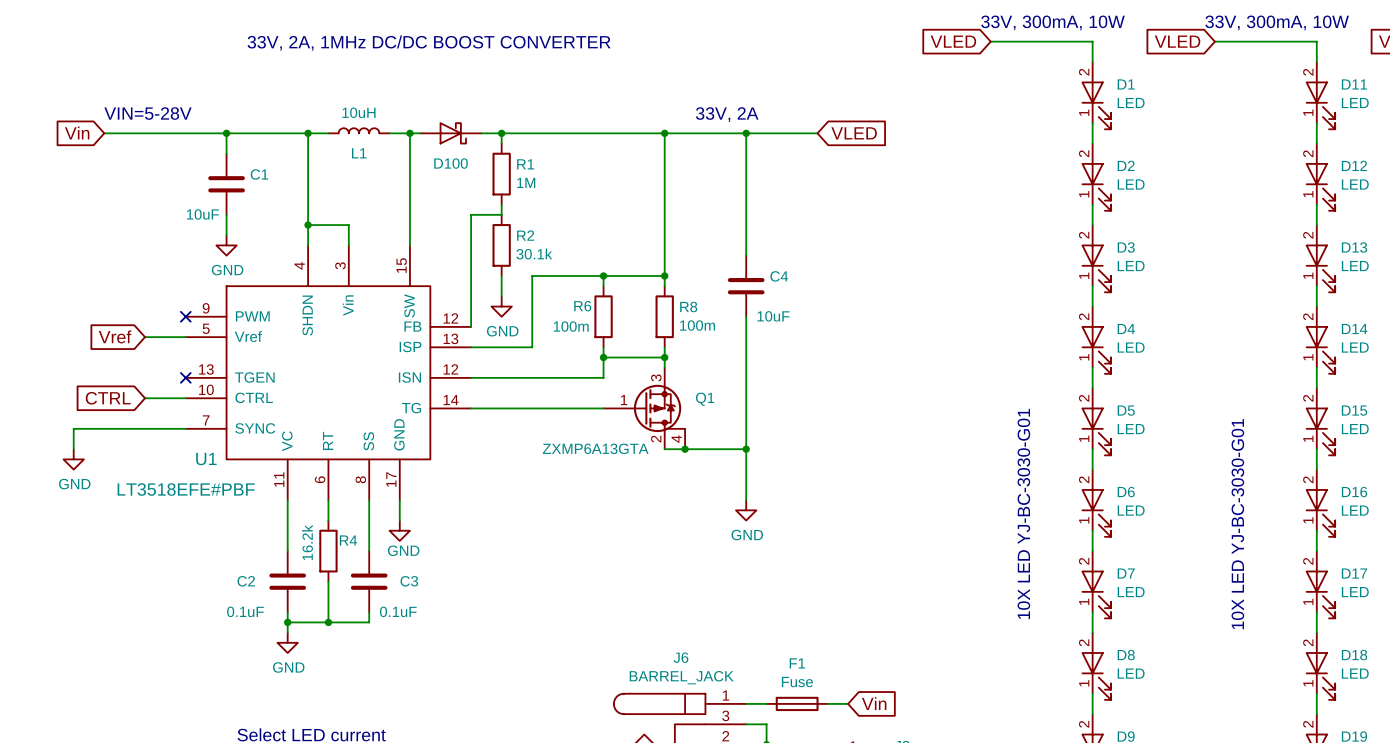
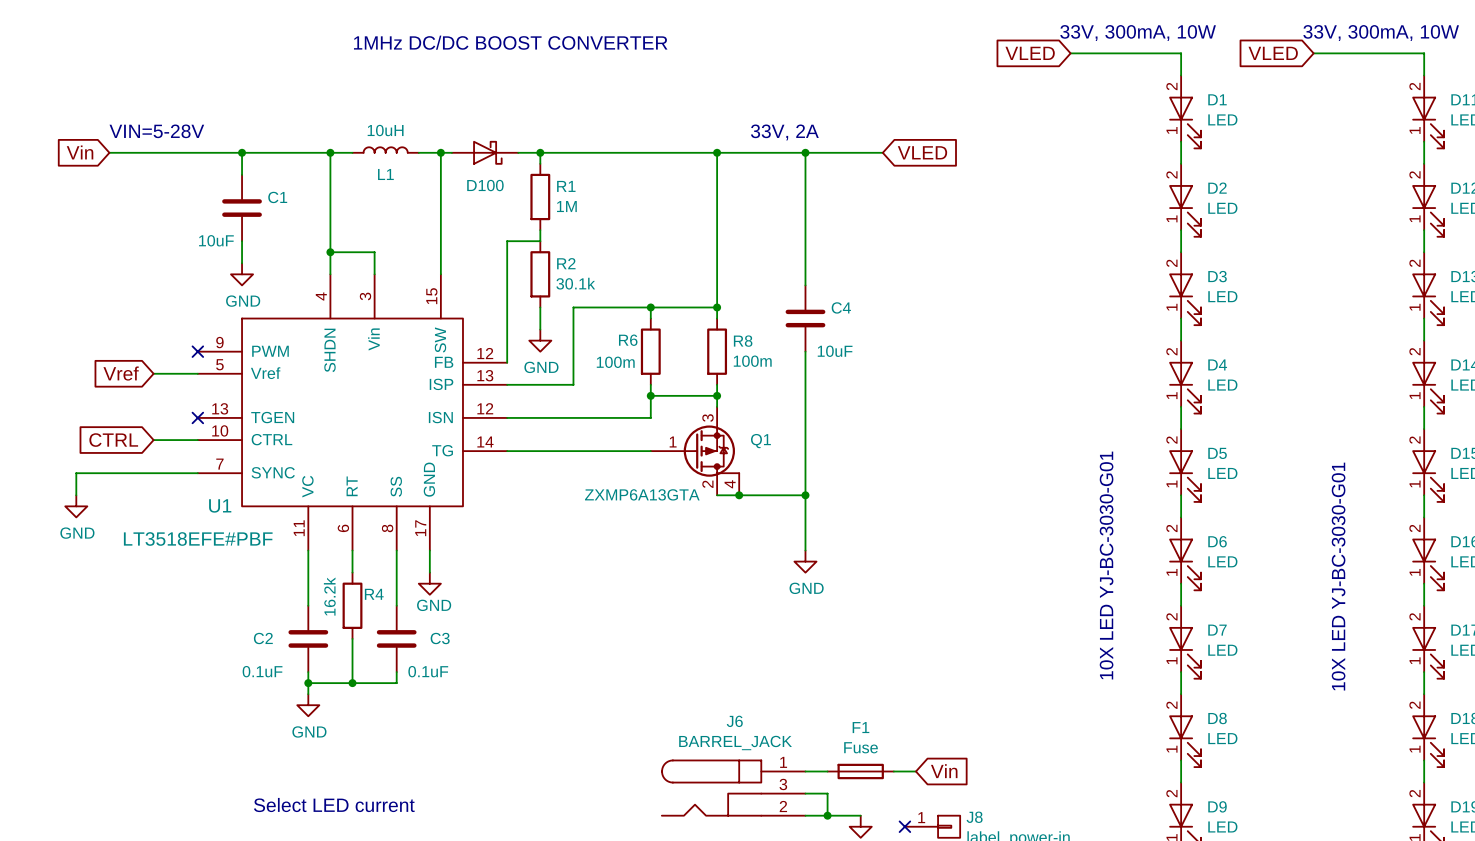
text: 33V, 2A, 1MHz DC/DC BOOST CONVERTER (429, 43) -> 1MHz DC/DC BOOST CONVERTER (510, 42)

